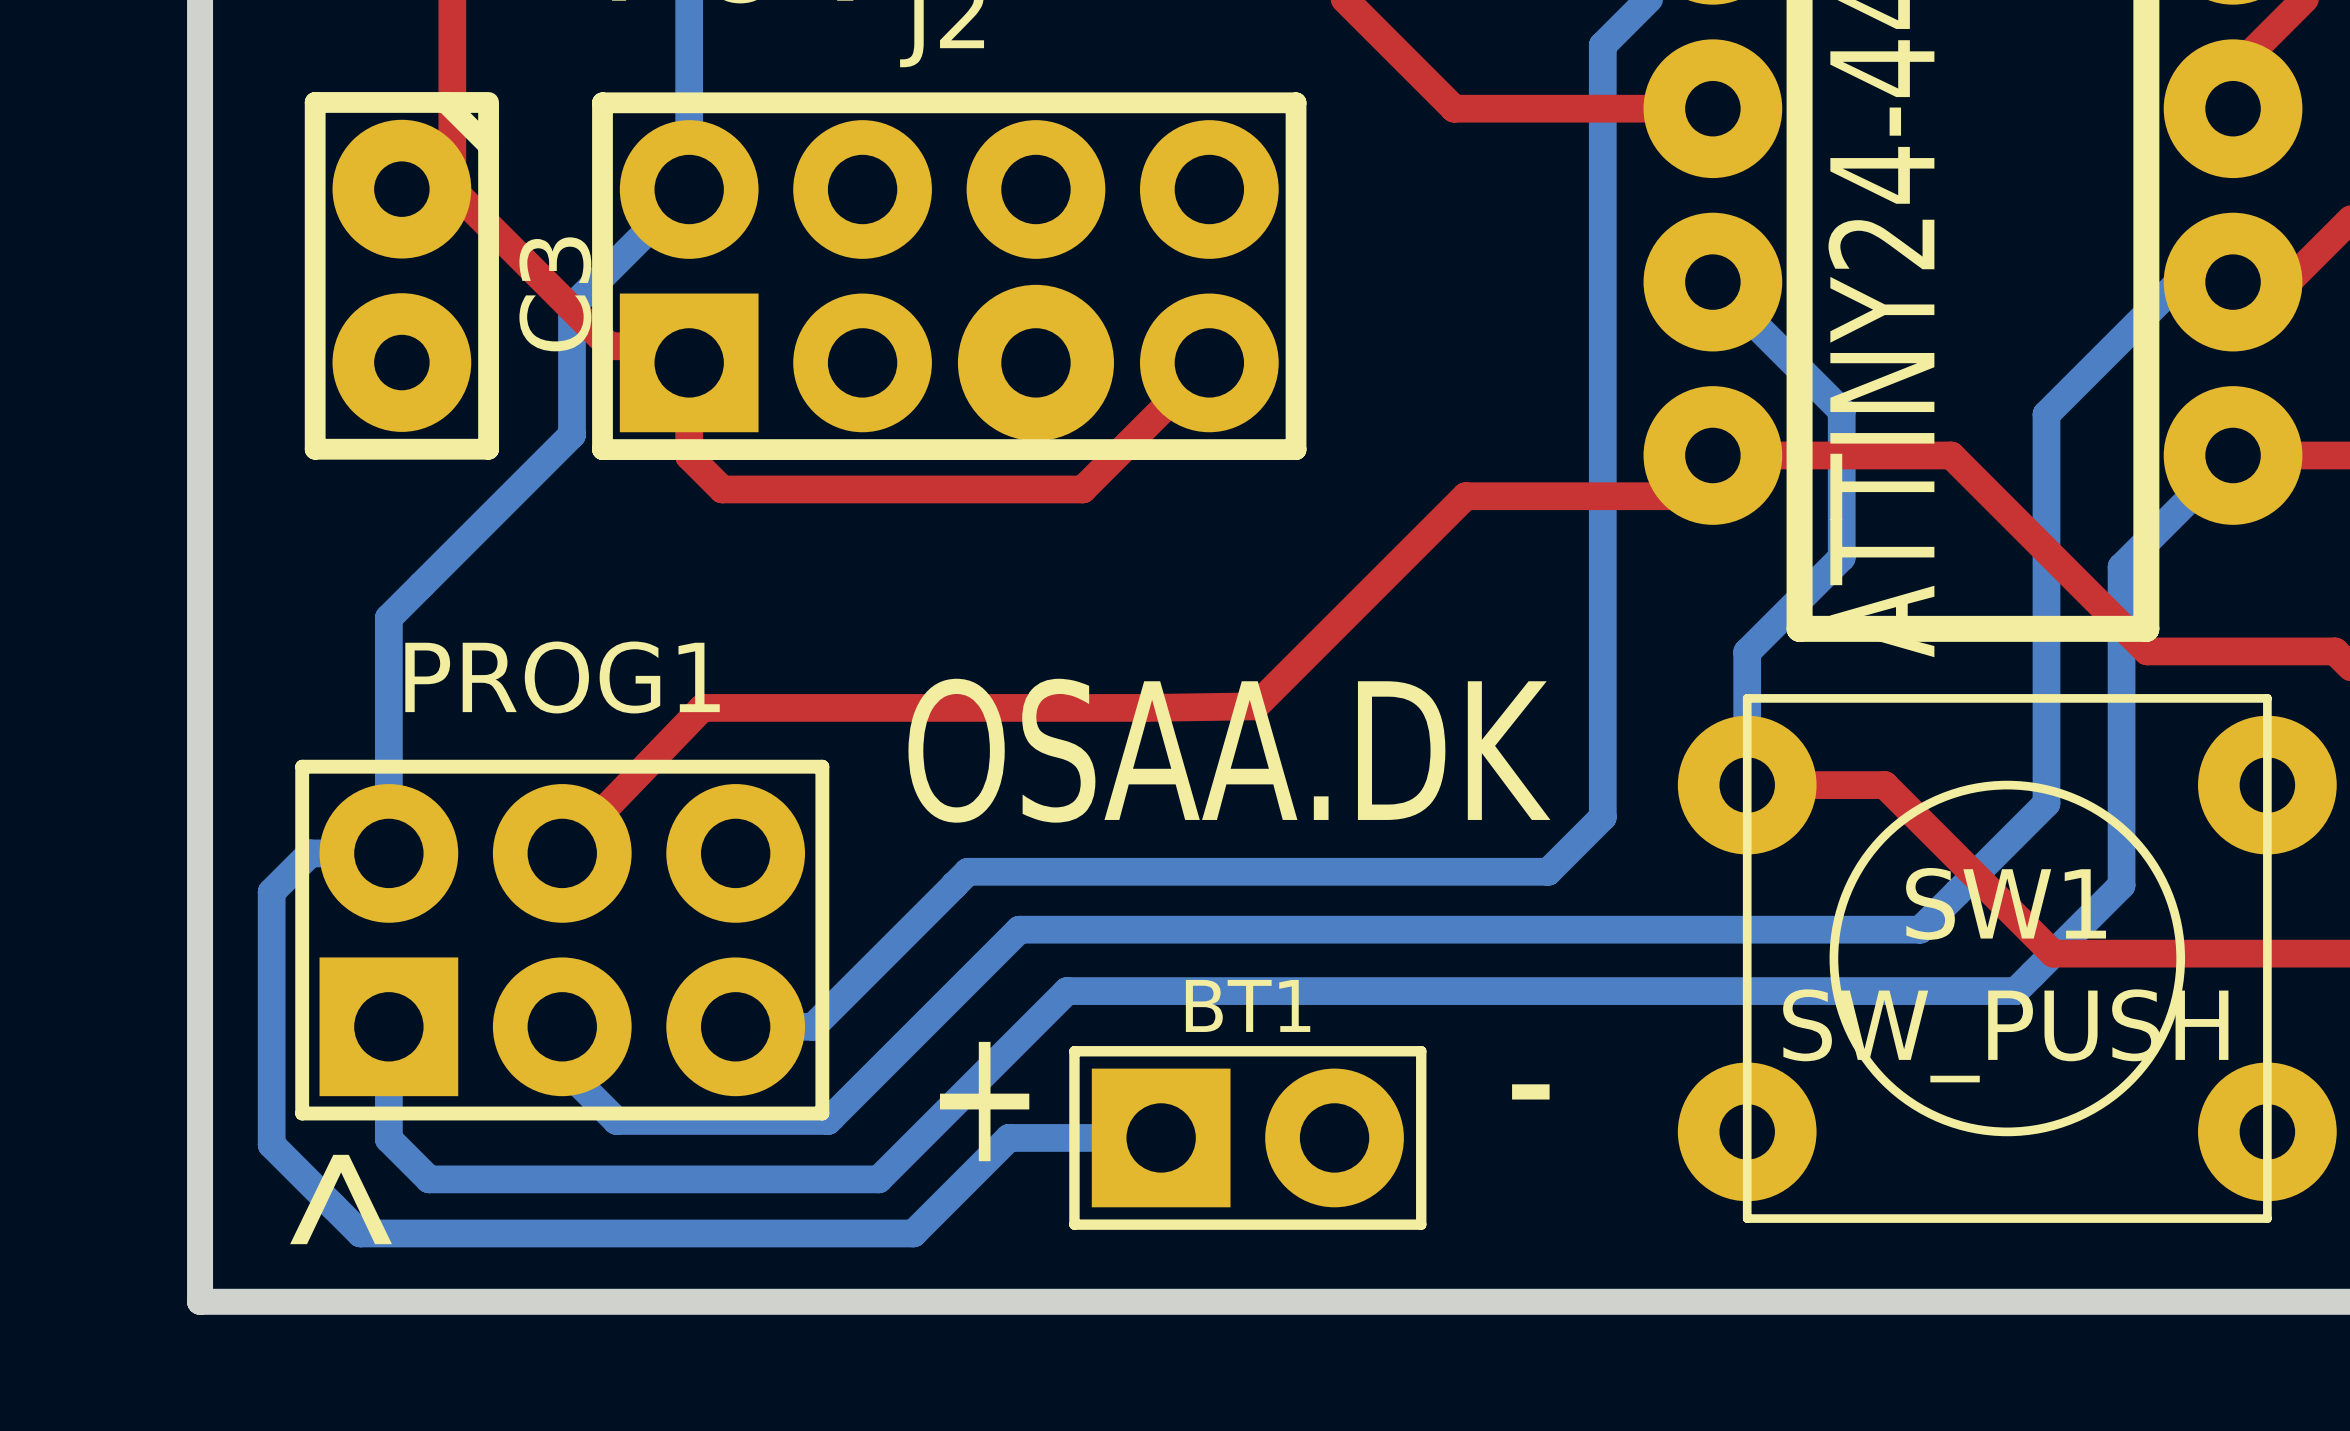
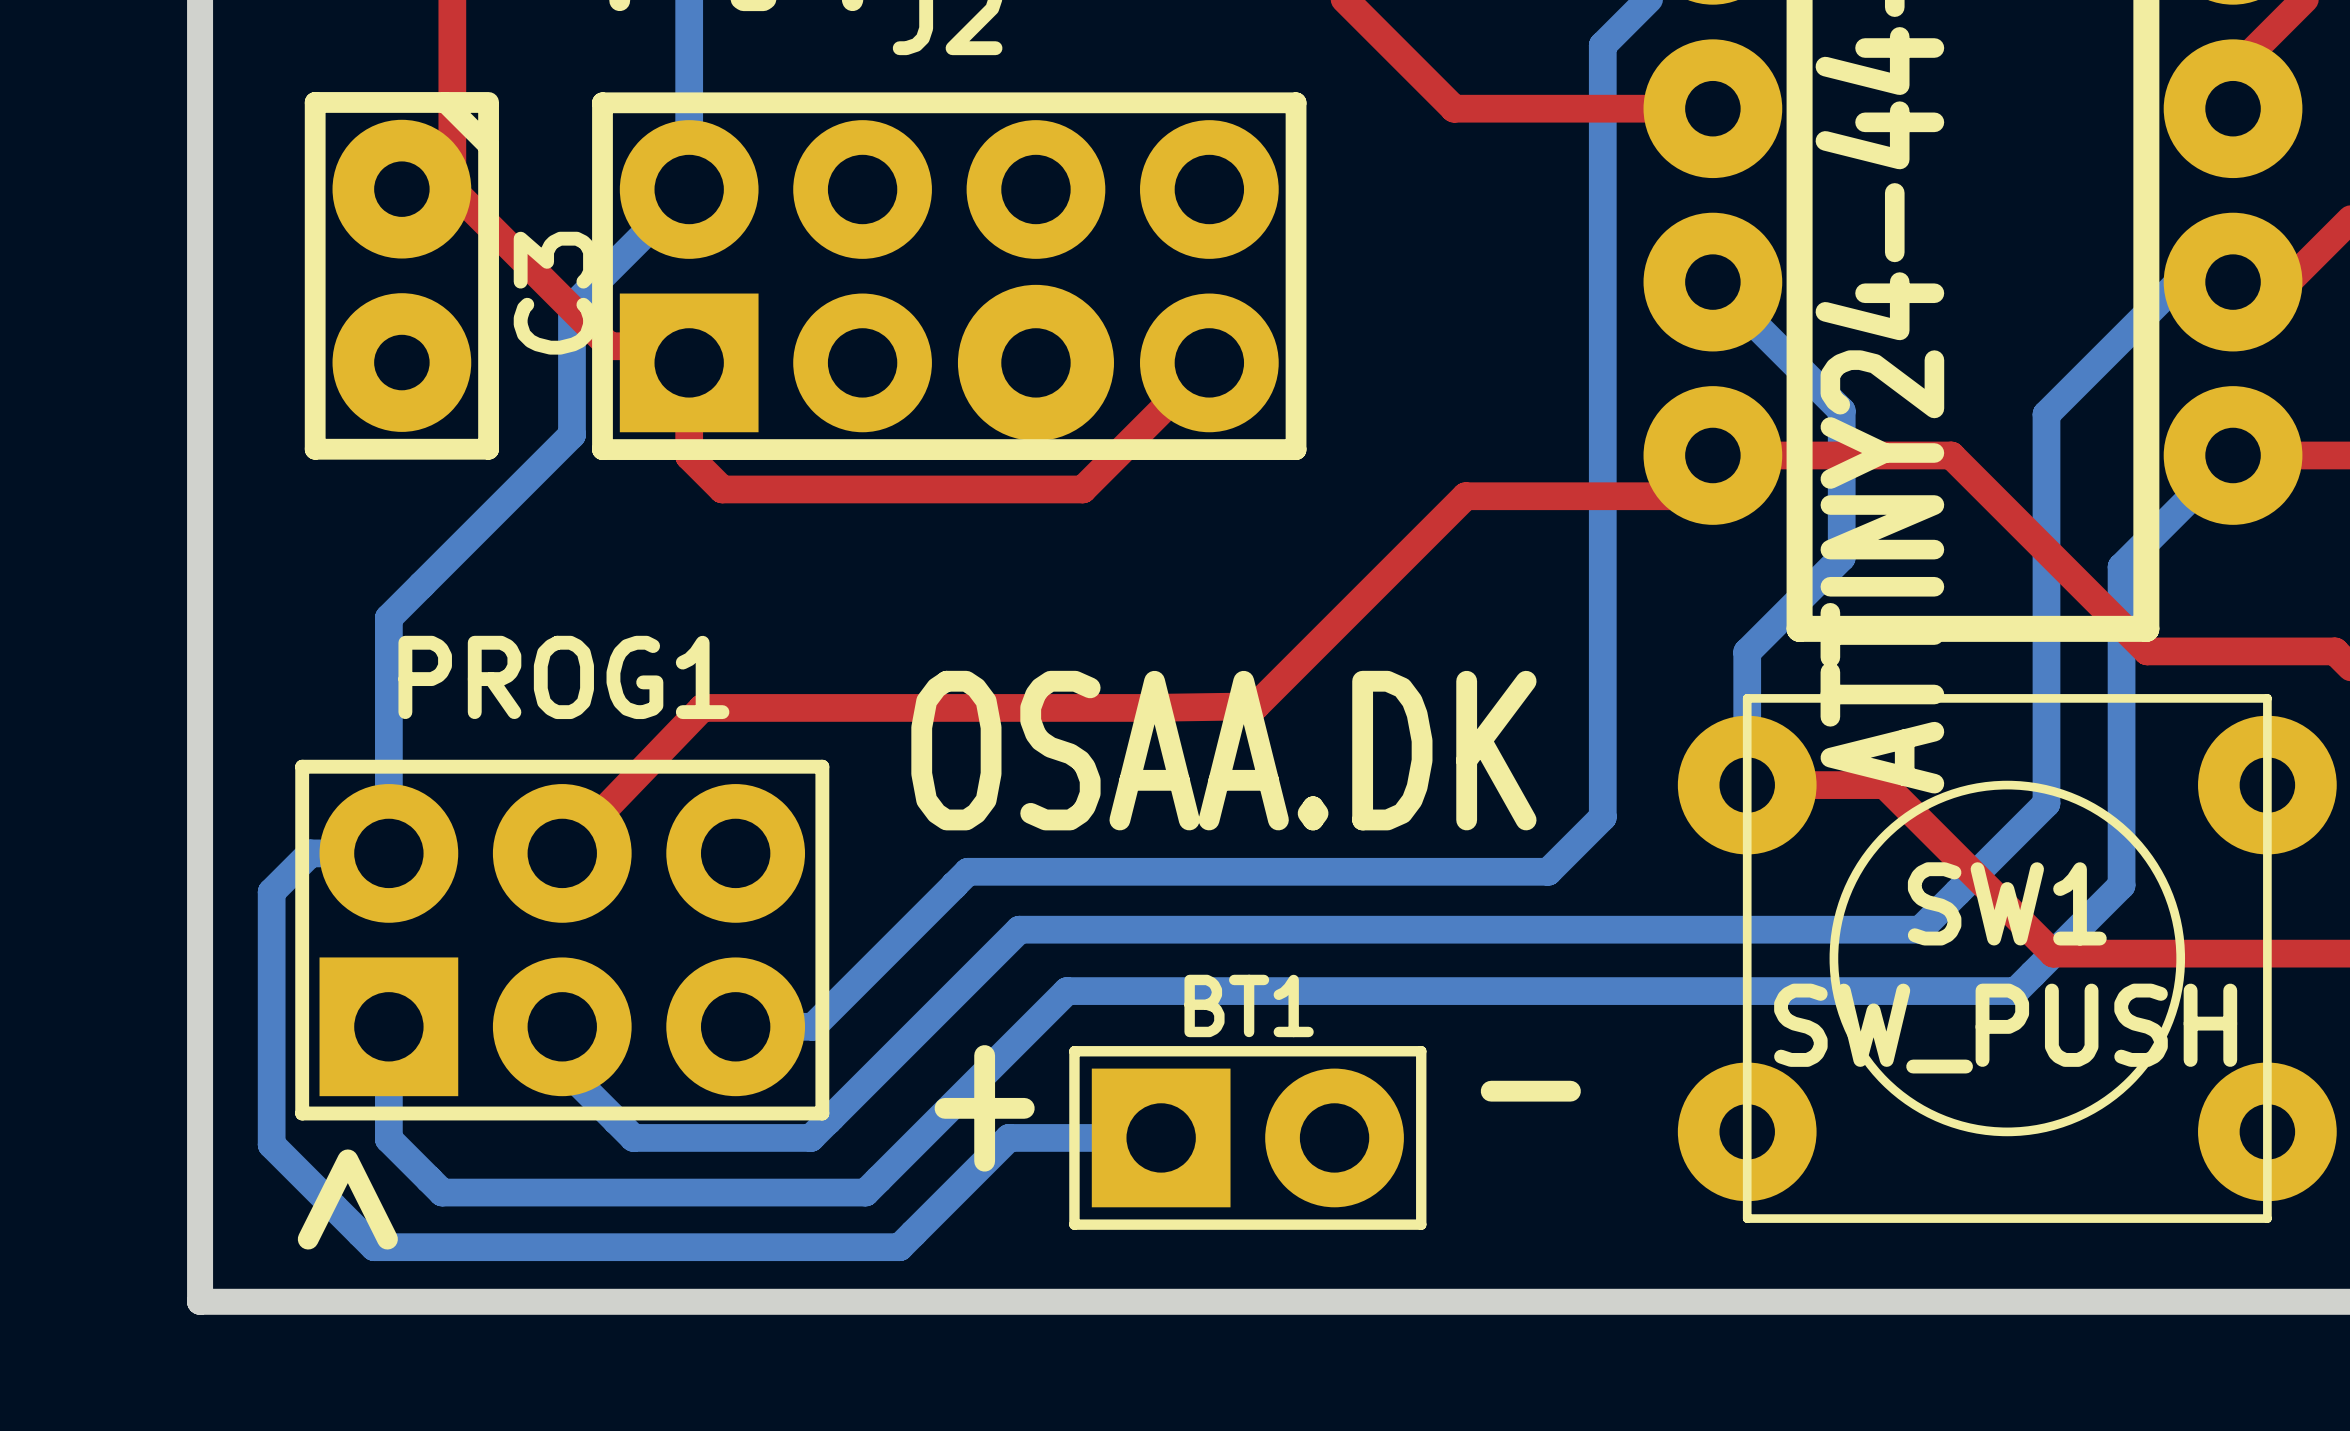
bottom track: (616, 1120) (827, 1120) -> (616, 1120) (633, 1137) (810, 1137) (827, 1120)
bottom track: (429, 1179) (878, 1179) -> (429, 1179) (442, 1192) (865, 1192) (878, 1179)
bottom track: (360, 1233) (913, 1233) -> (360, 1233) (374, 1247) (899, 1247) (913, 1233)

